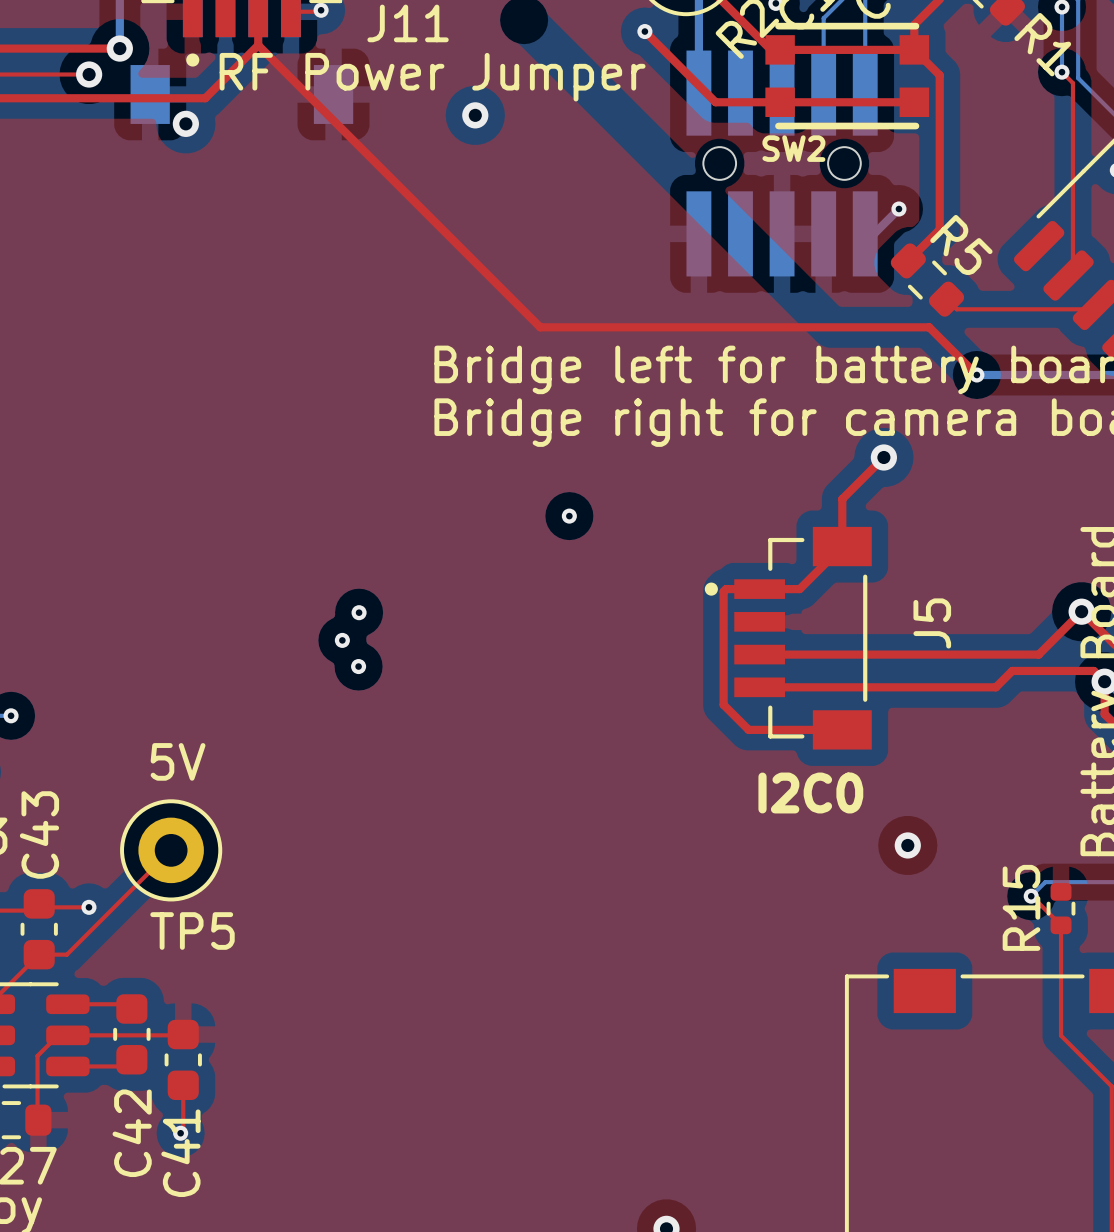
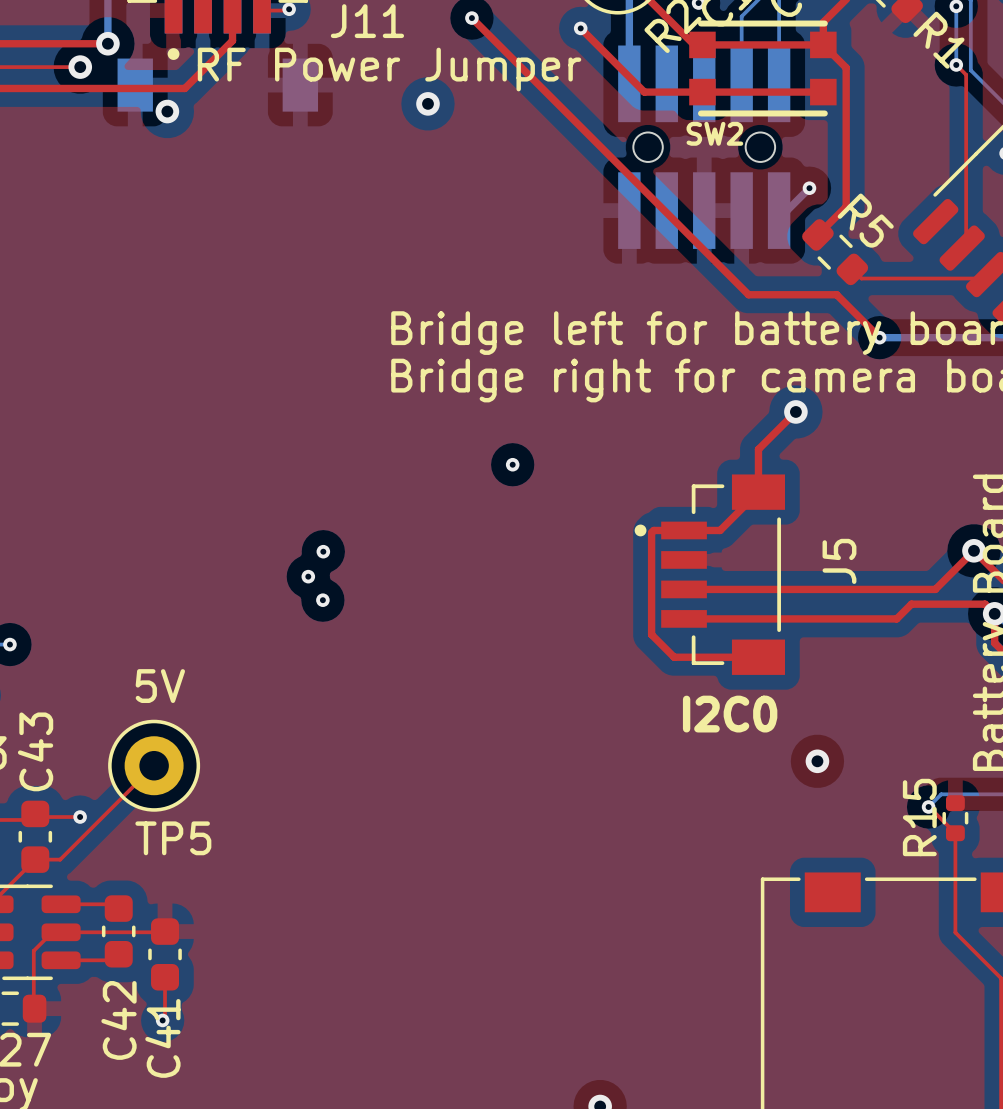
via: none -> (471, 18)
top track: (258, 45) (540, 327) (831, 327) -> (471, 18) (748, 294)

